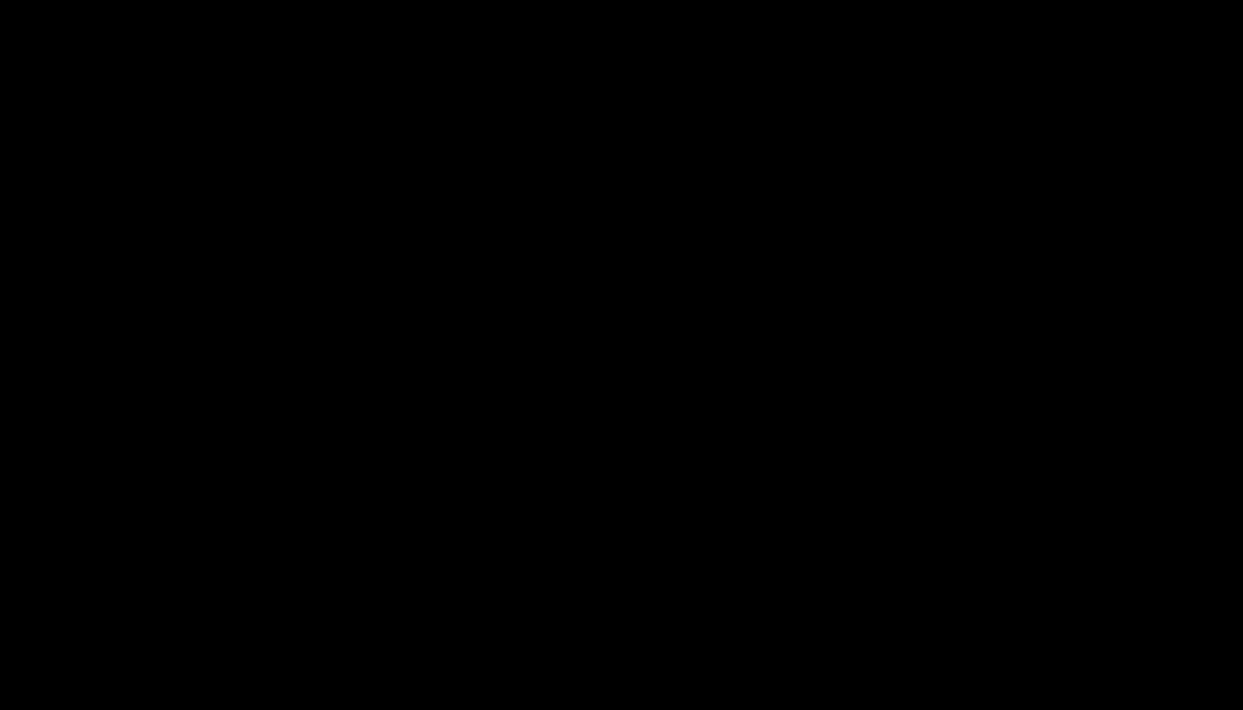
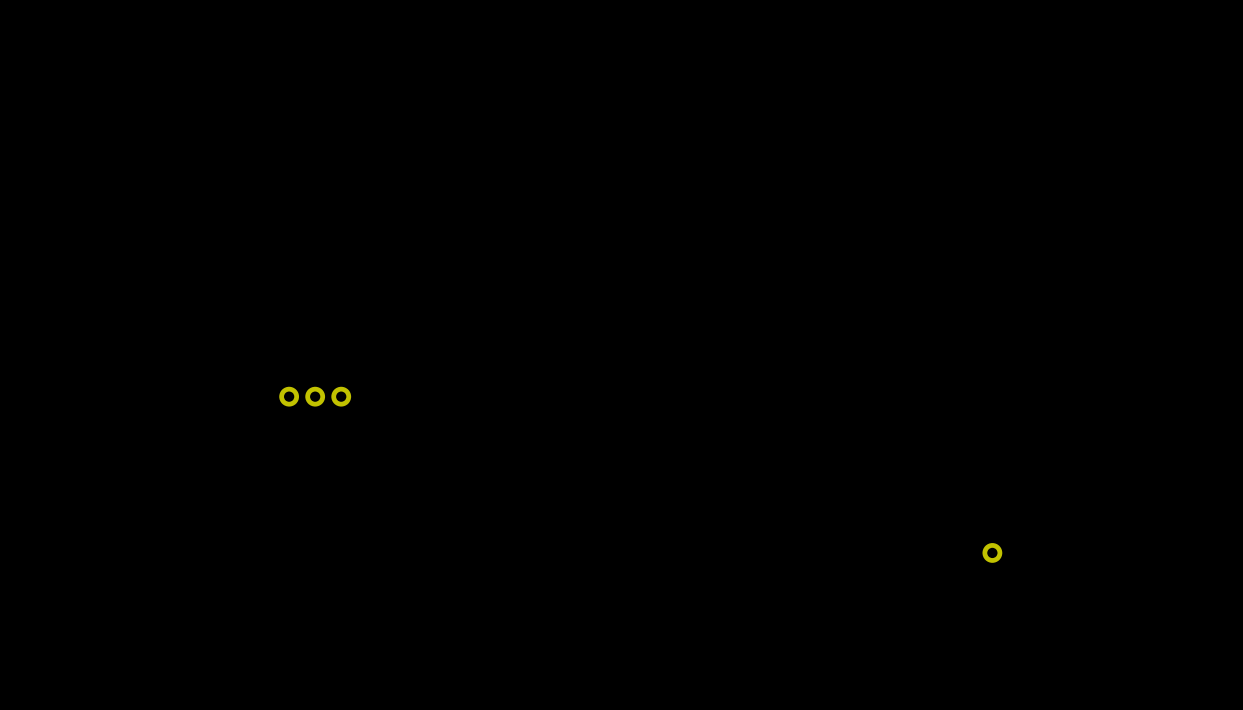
part: none -> (315, 396)
part: none -> (992, 552)

